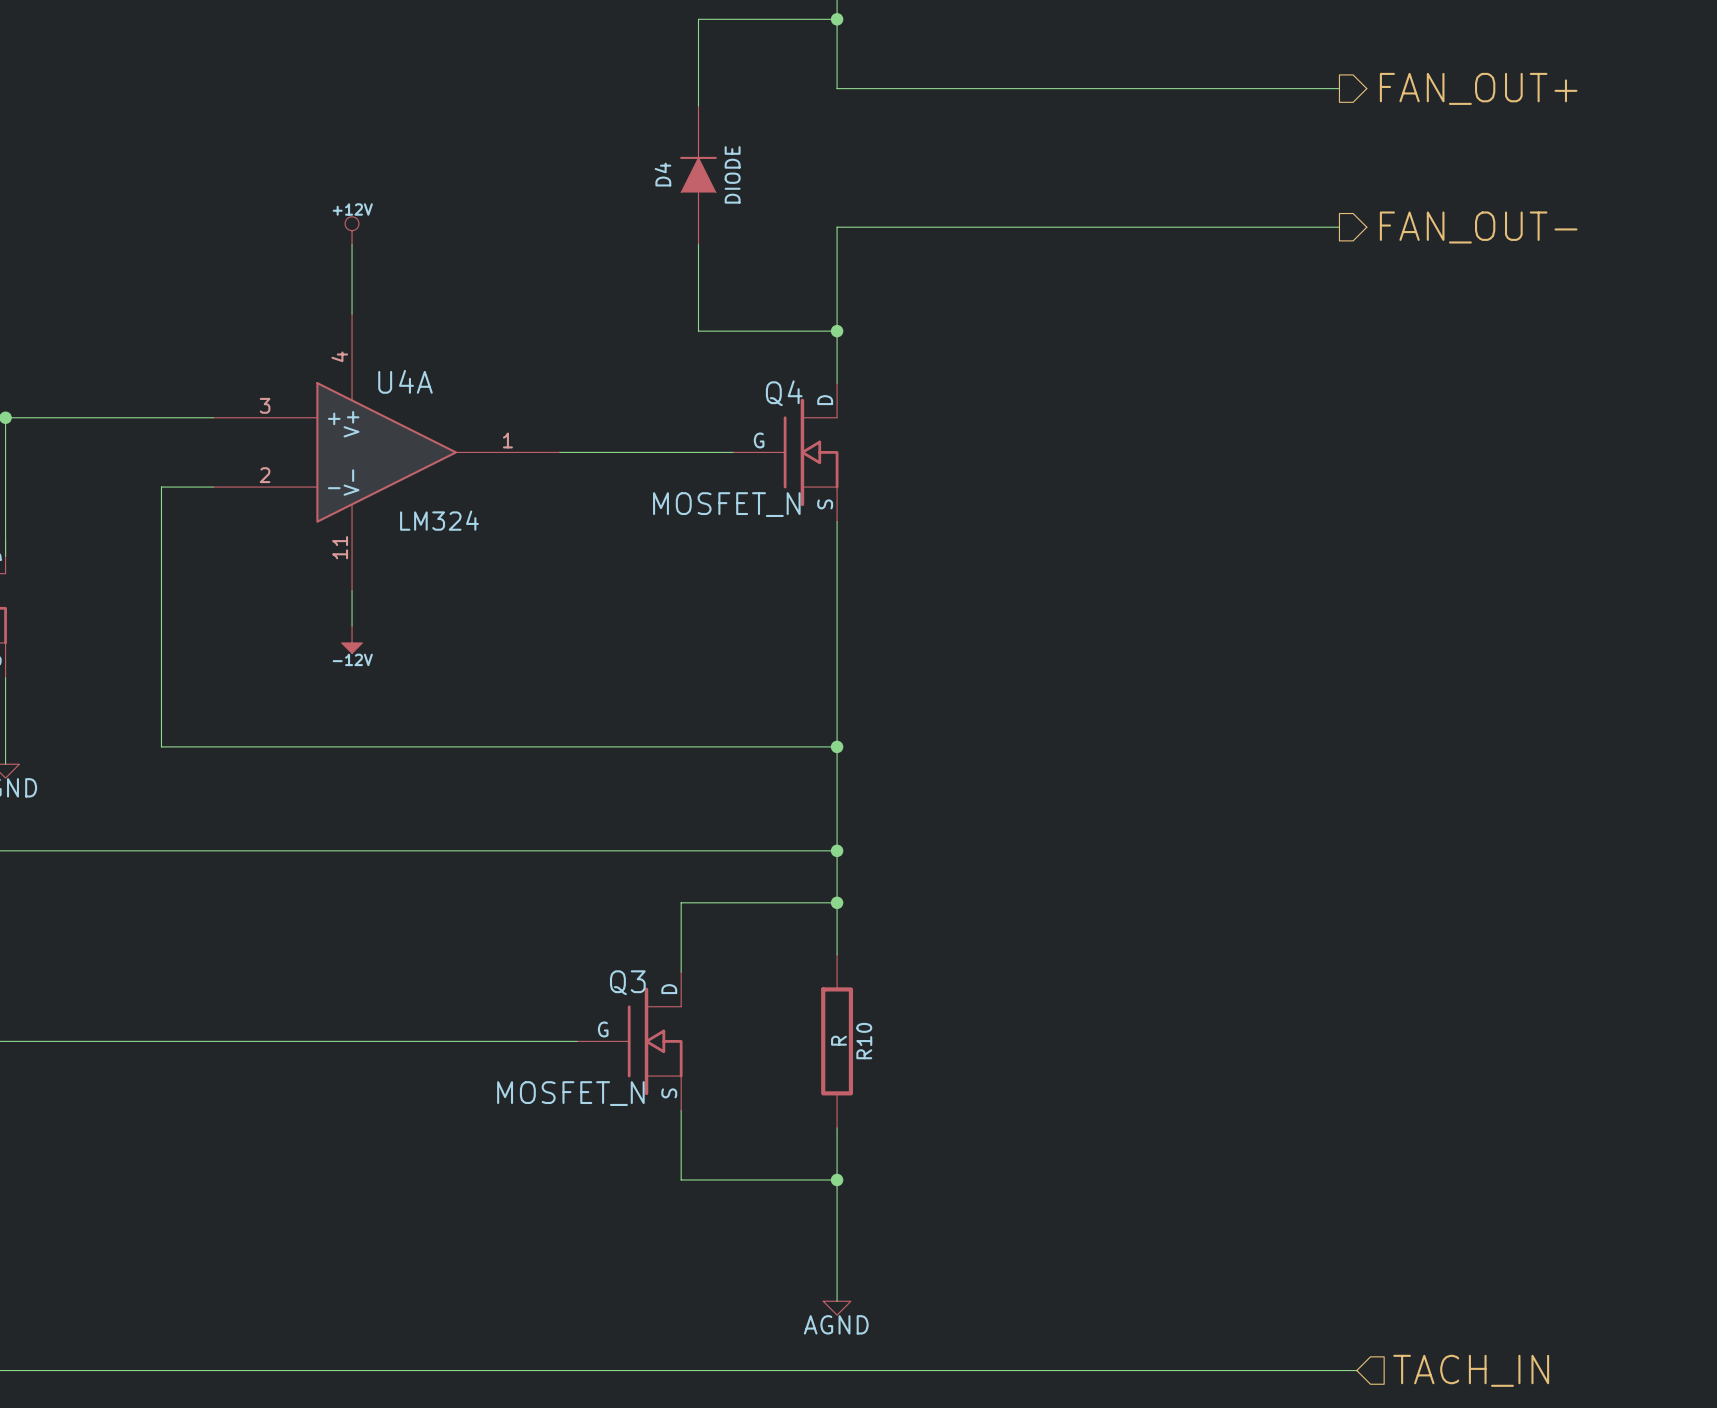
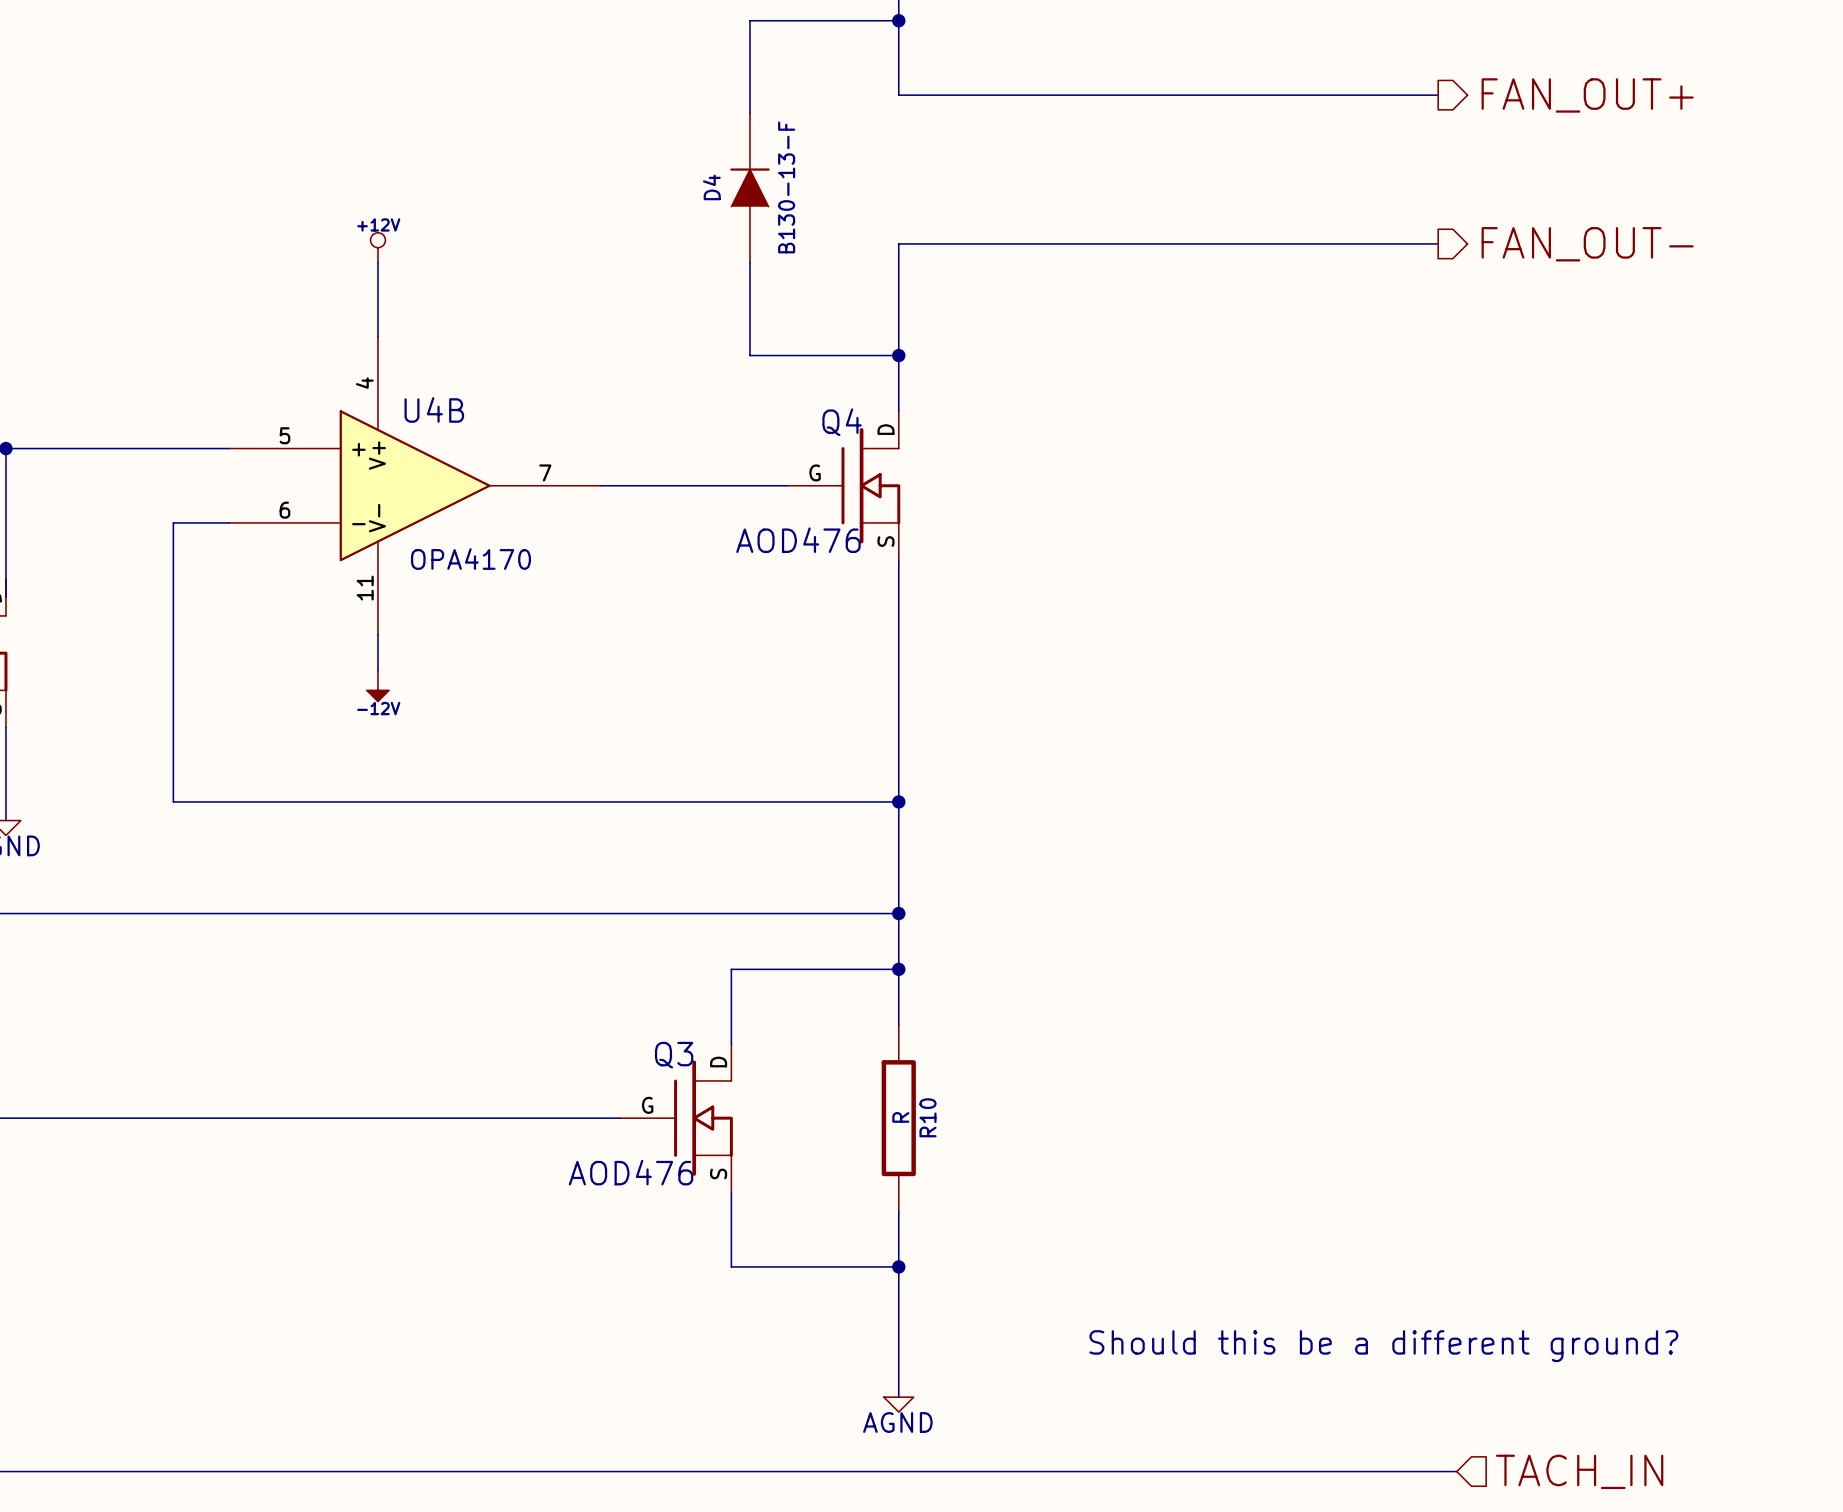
D4 value: DIODE (732, 174) -> B130-13-F (786, 187)
U4A name: U4A (405, 381) -> U4B (434, 409)
U4A pin number: 3 (265, 405) -> 5 (284, 435)
U4A pin number: 1 (507, 440) -> 7 (545, 472)
U4A pin number: 2 (265, 475) -> 6 (284, 510)
Q4 value: MOSFET_N (726, 504) -> AOD476 (798, 540)
U4A value: LM324 (439, 520) -> OPA4170 (470, 559)
Q3 value: MOSFET_N (570, 1093) -> AOD476 (631, 1172)
text: none -> Should this be a different ground? (1383, 1346)

